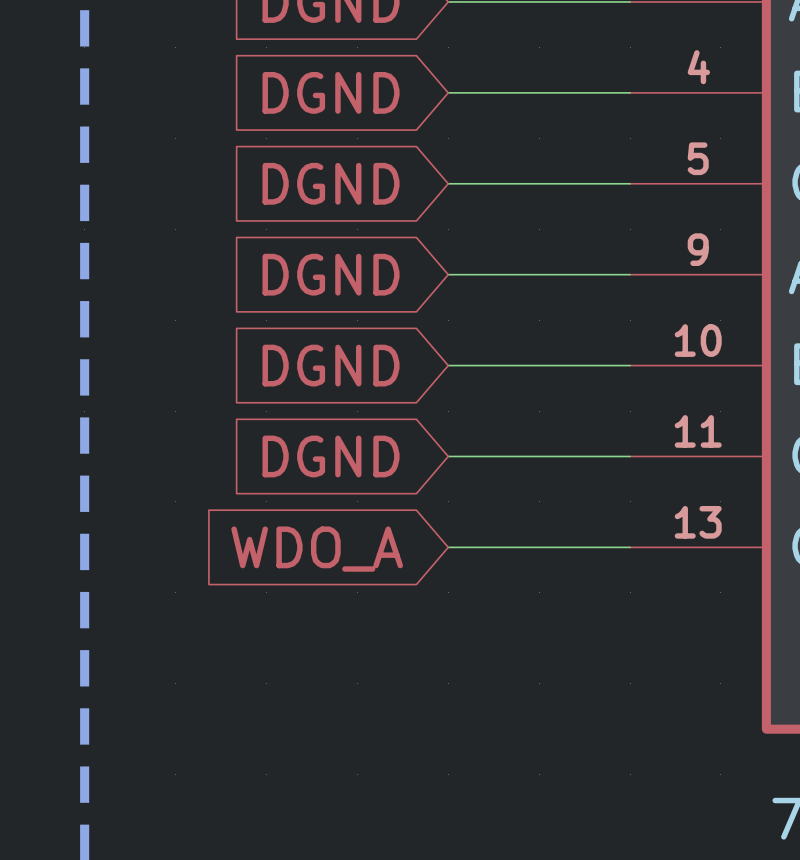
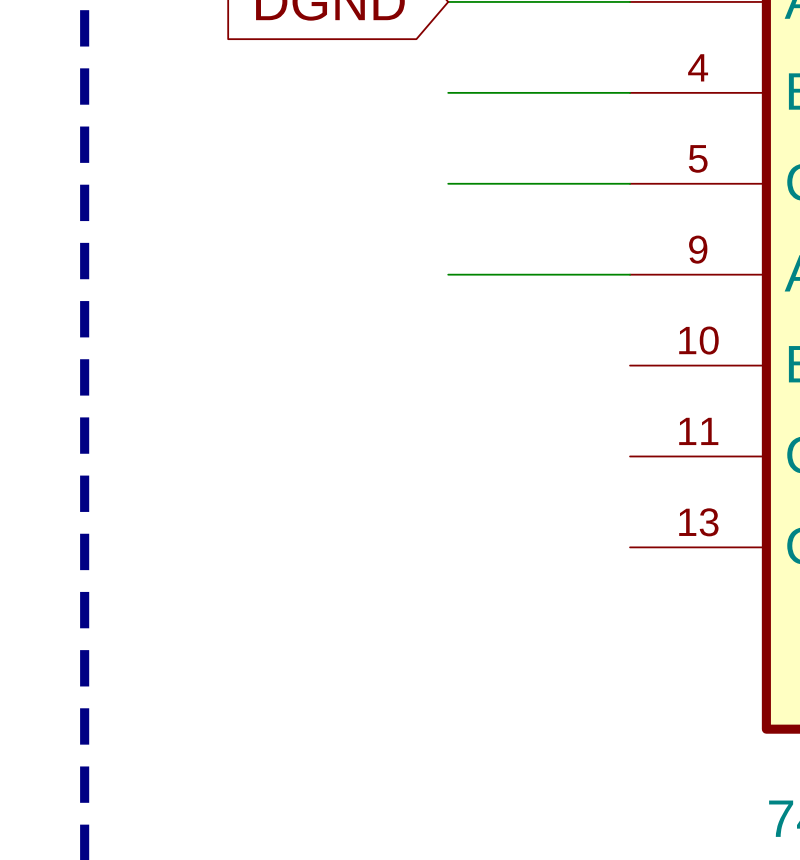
global label: DGND (331, 92) -> none
global label: DGND (331, 183) -> none
global label: DGND (331, 274) -> none
global label: DGND (331, 365) -> none
wire: (448, 365) (630, 365) -> none
global label: DGND (331, 456) -> none
wire: (448, 456) (630, 456) -> none
wire: (448, 547) (630, 547) -> none
global label: WDO_A (317, 549) -> none

